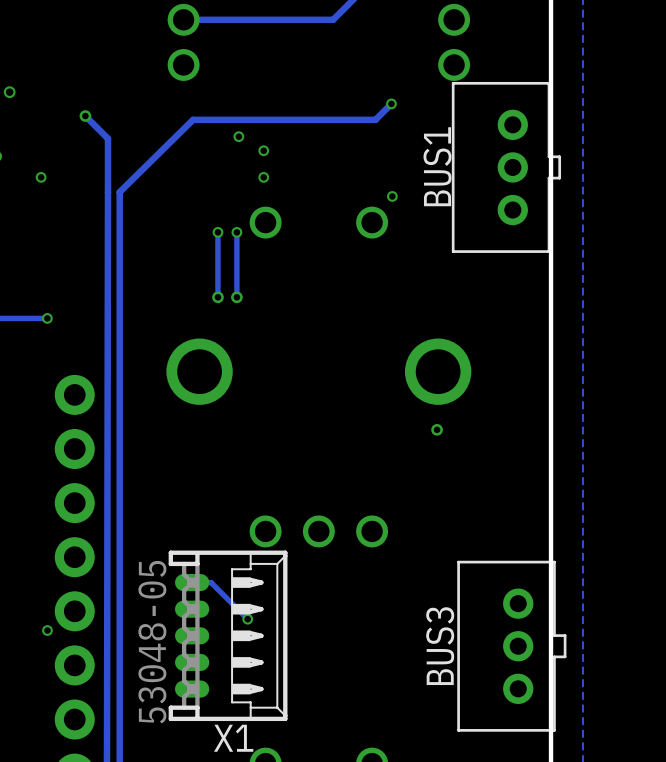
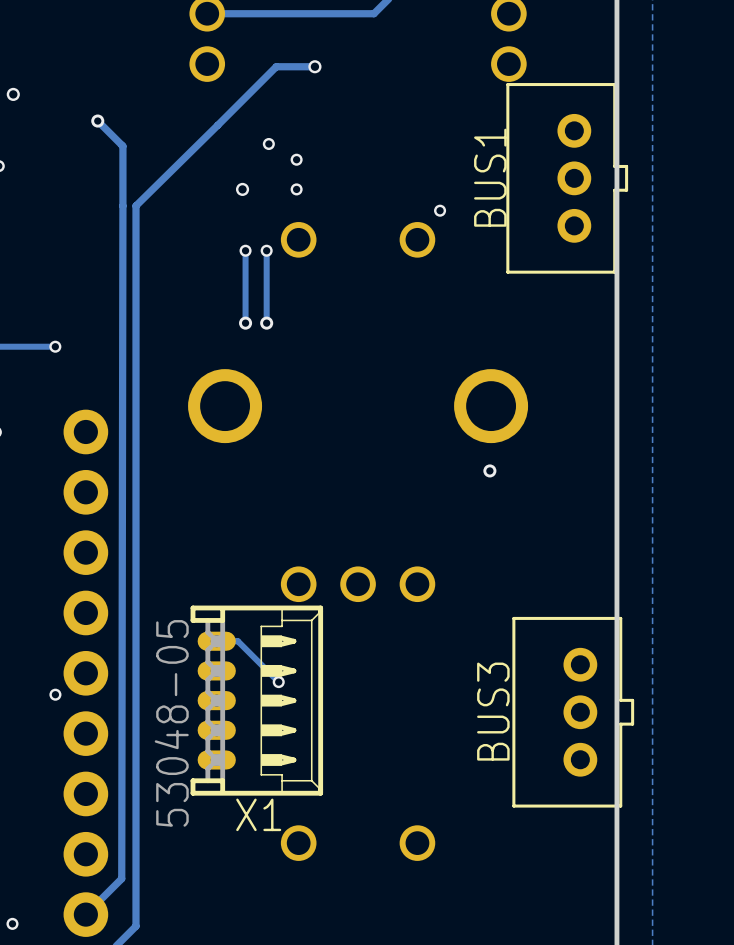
via: none -> (314, 66)
track: (391, 103) (375, 119) (193, 119) -> (314, 66) (276, 66) (217, 125)
via: (391, 103) -> none
via: (41, 177) -> none
via: none -> (242, 189)

